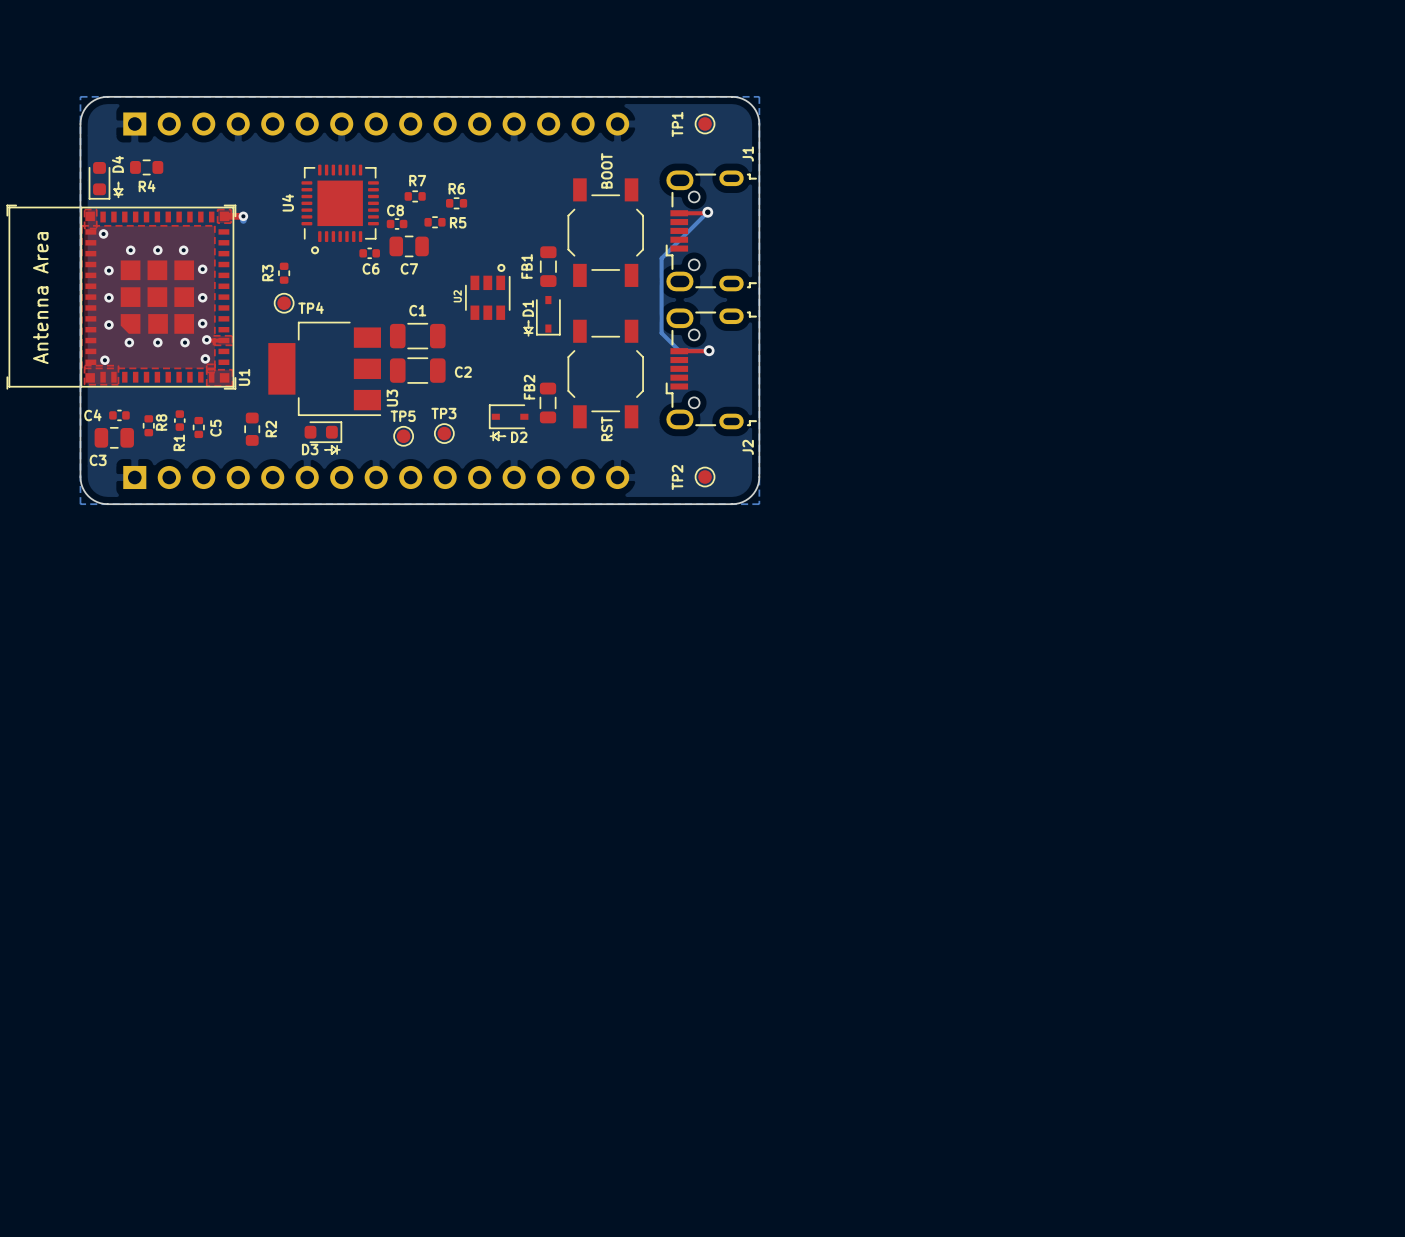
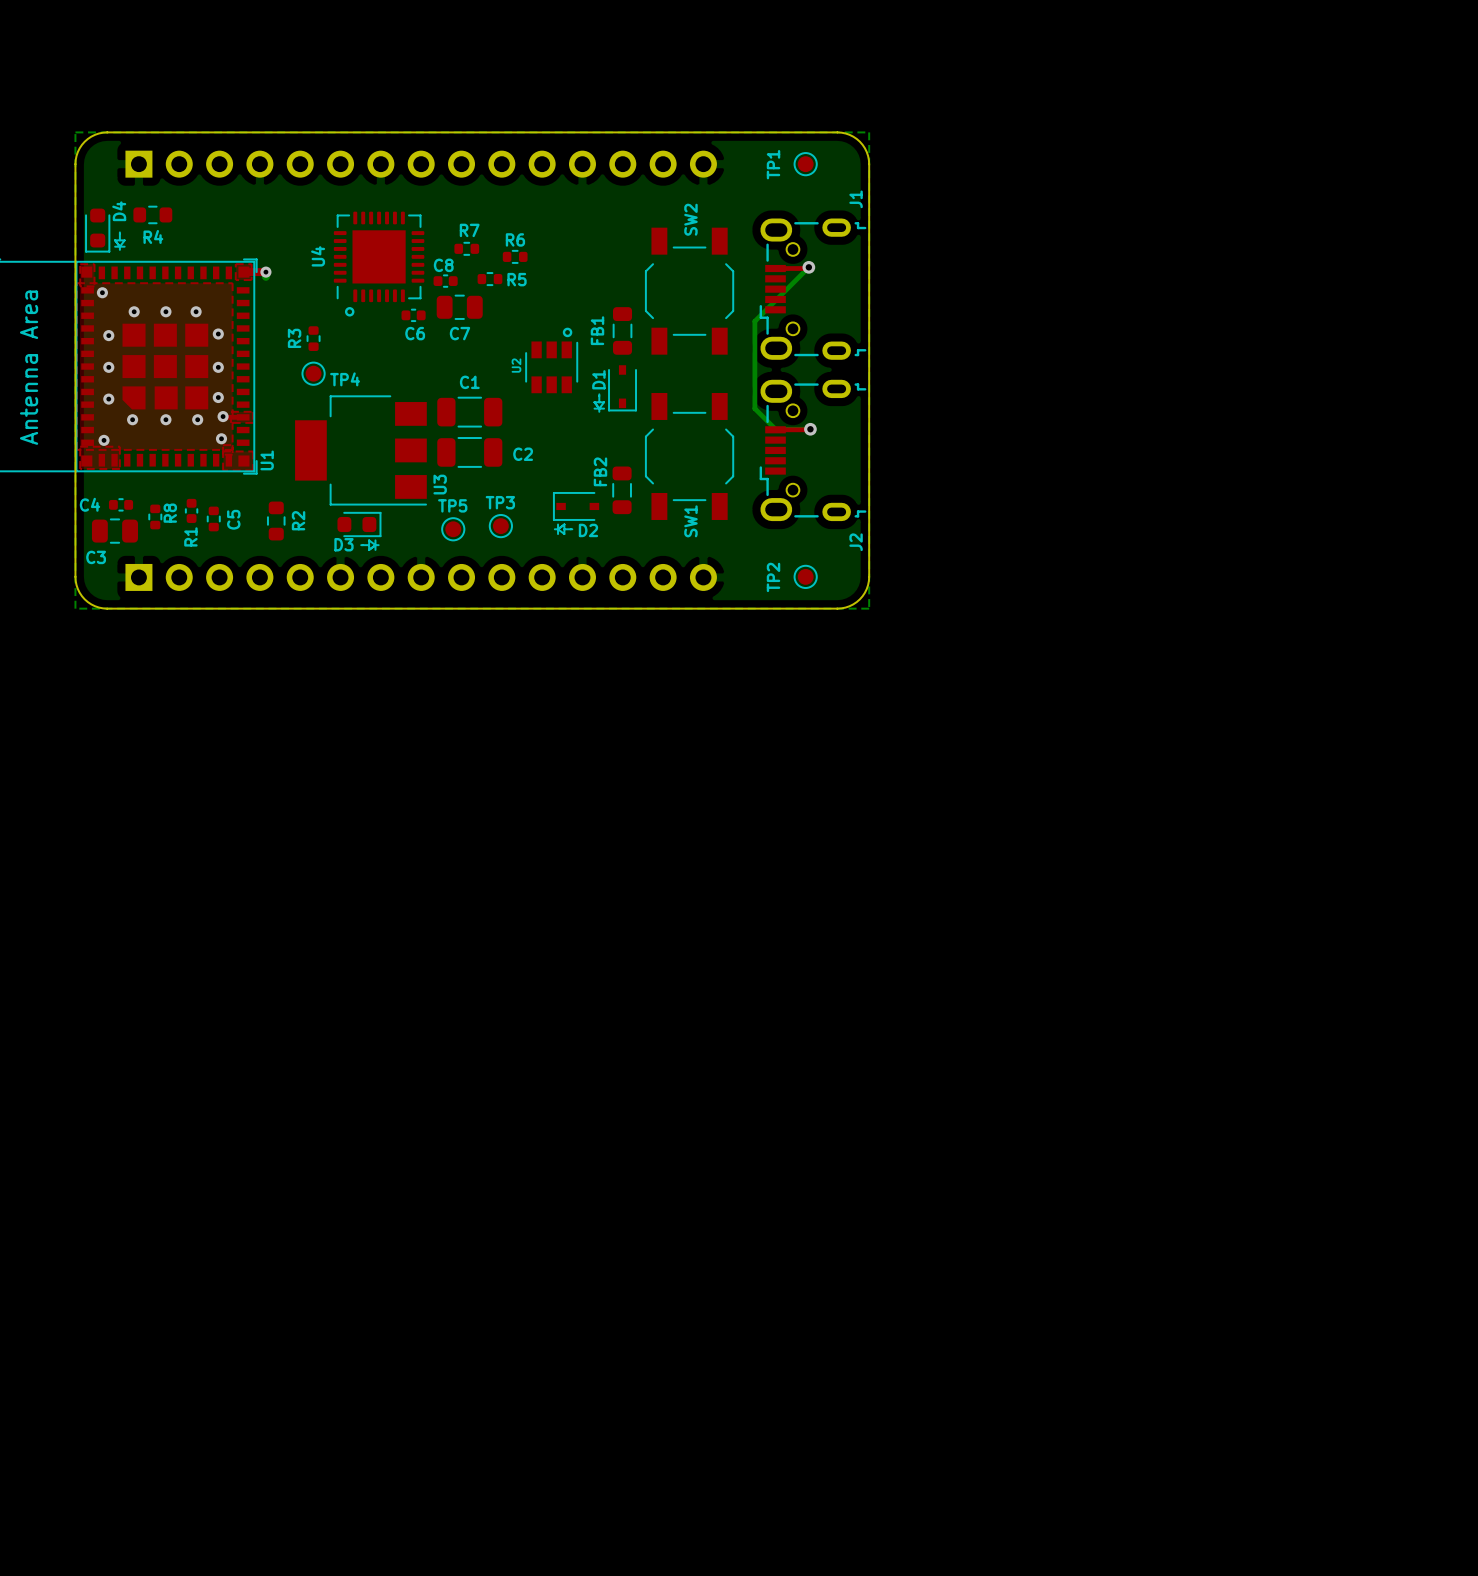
BOOT name: BOOT (606, 170) -> SW2 (690, 219)
RST name: RST (606, 428) -> SW1 (690, 521)

